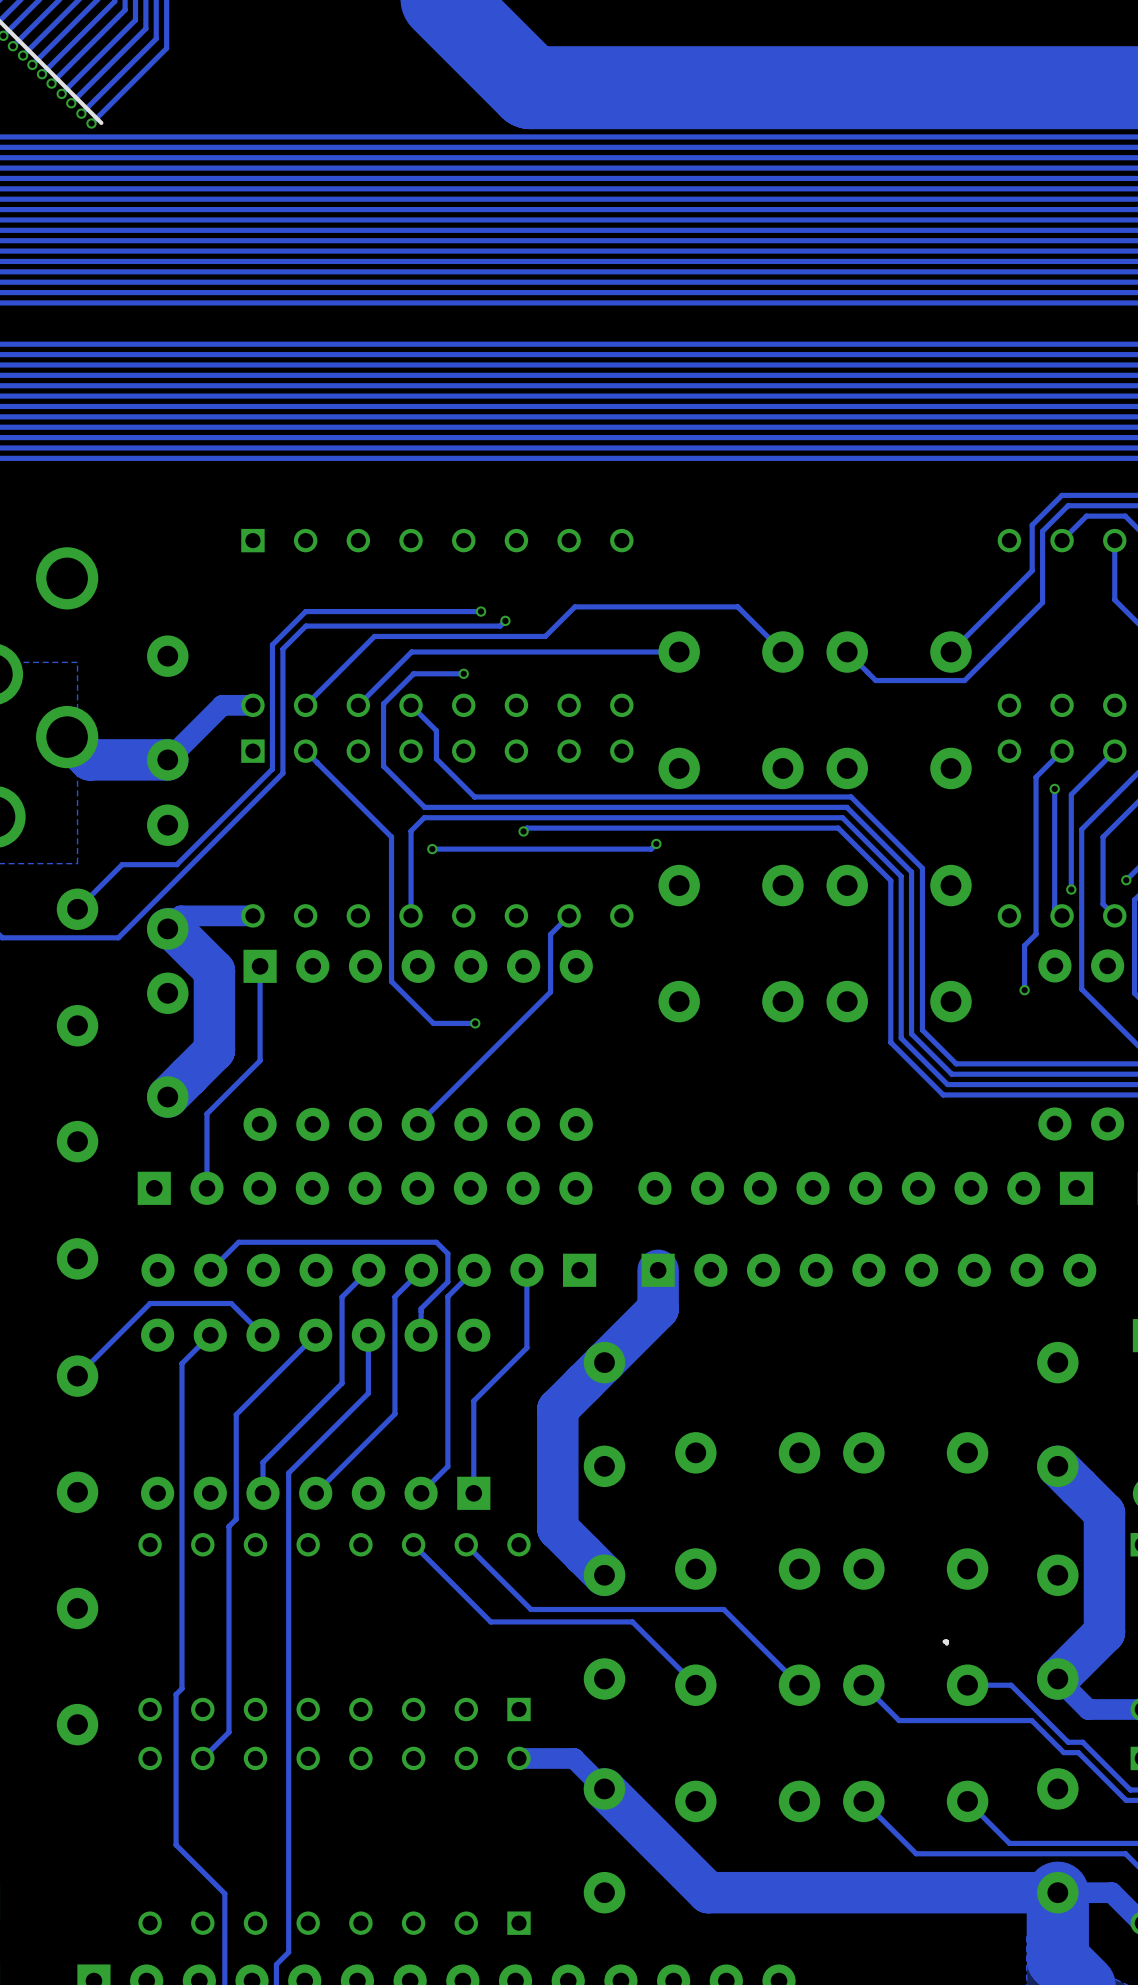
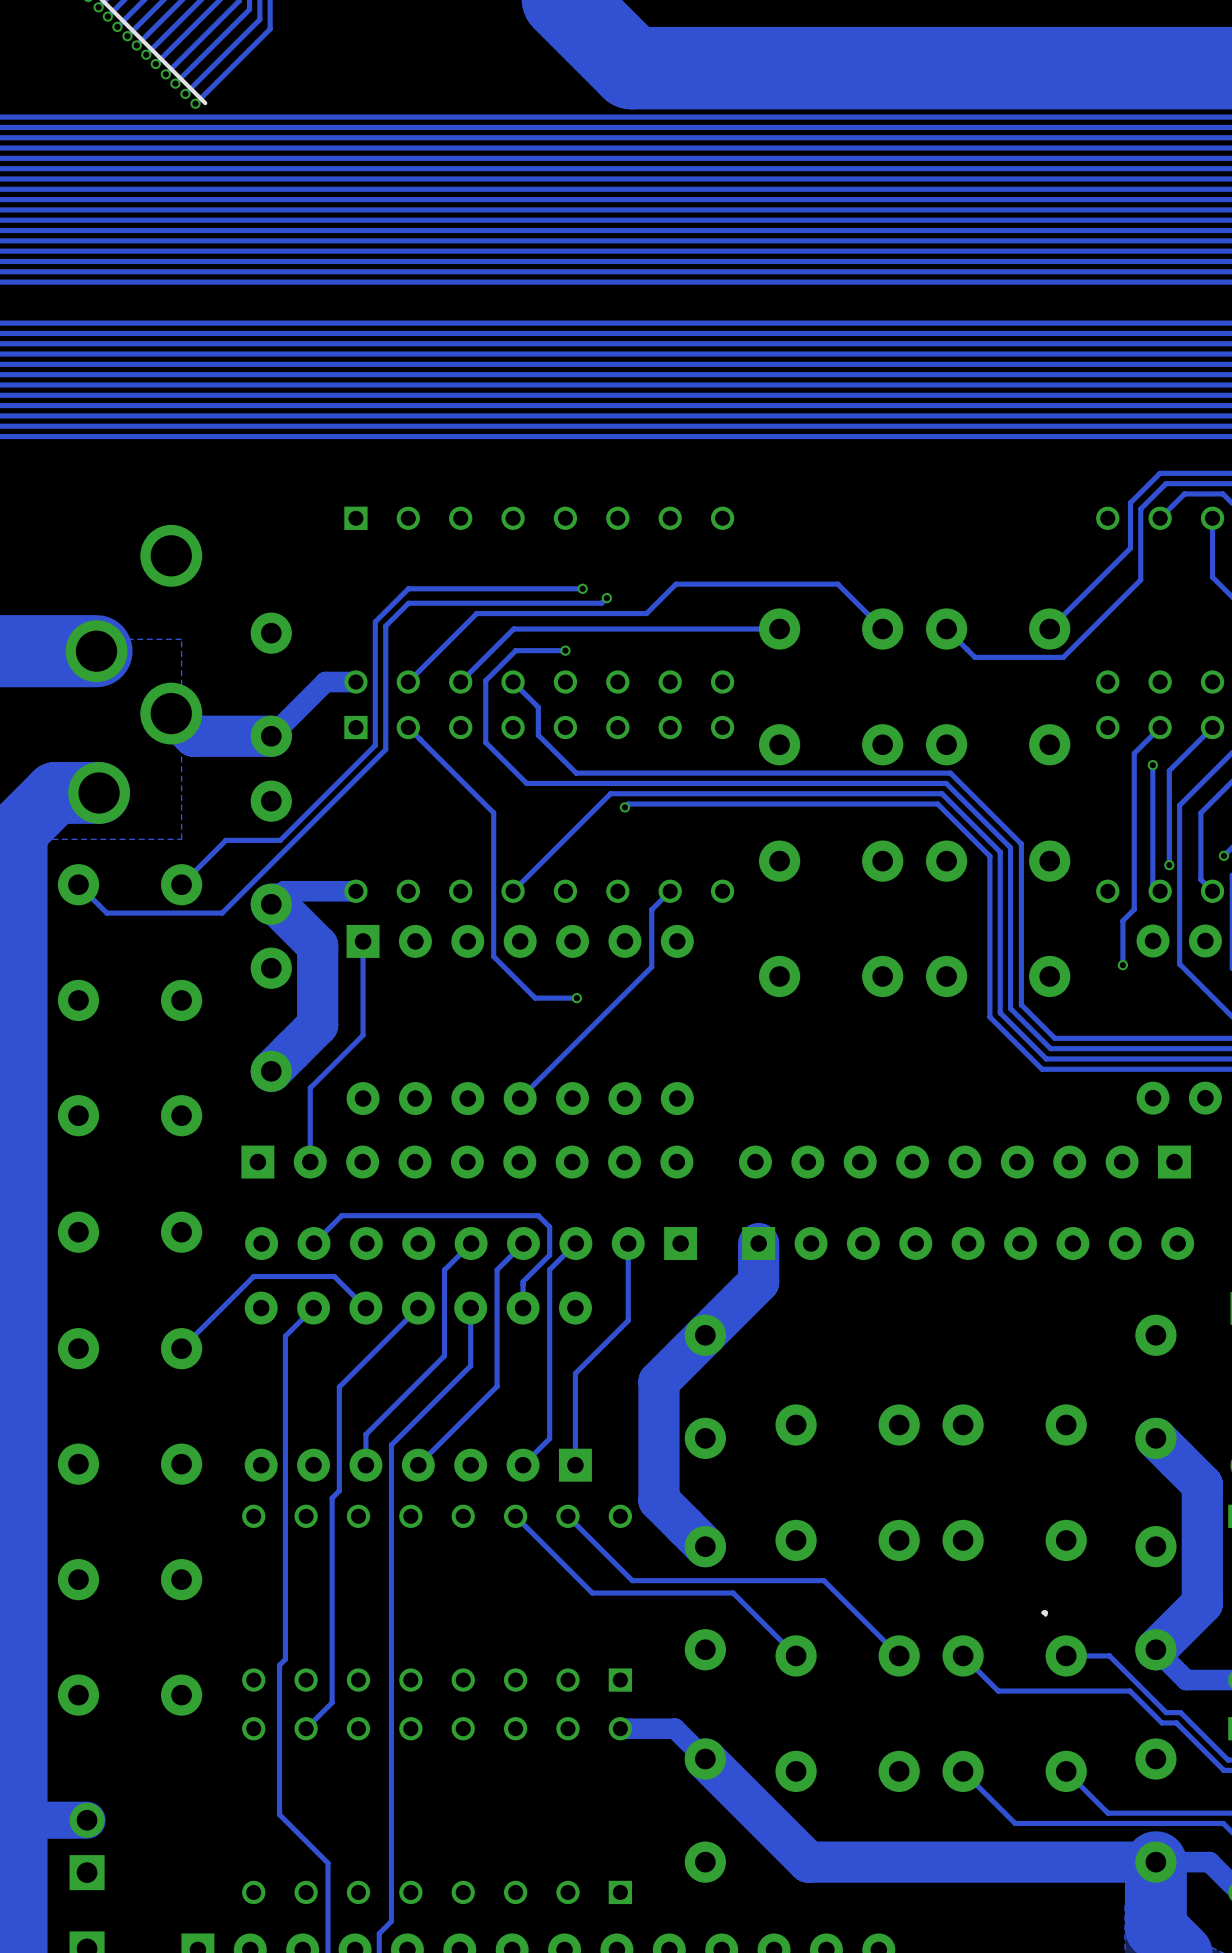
track: (509, 817) (424, 817) (411, 830) (411, 915) -> (610, 793) (513, 891)
track: (656, 843) (651, 849) (432, 849) -> none
via: (656, 843) -> none
via: (432, 849) -> none

